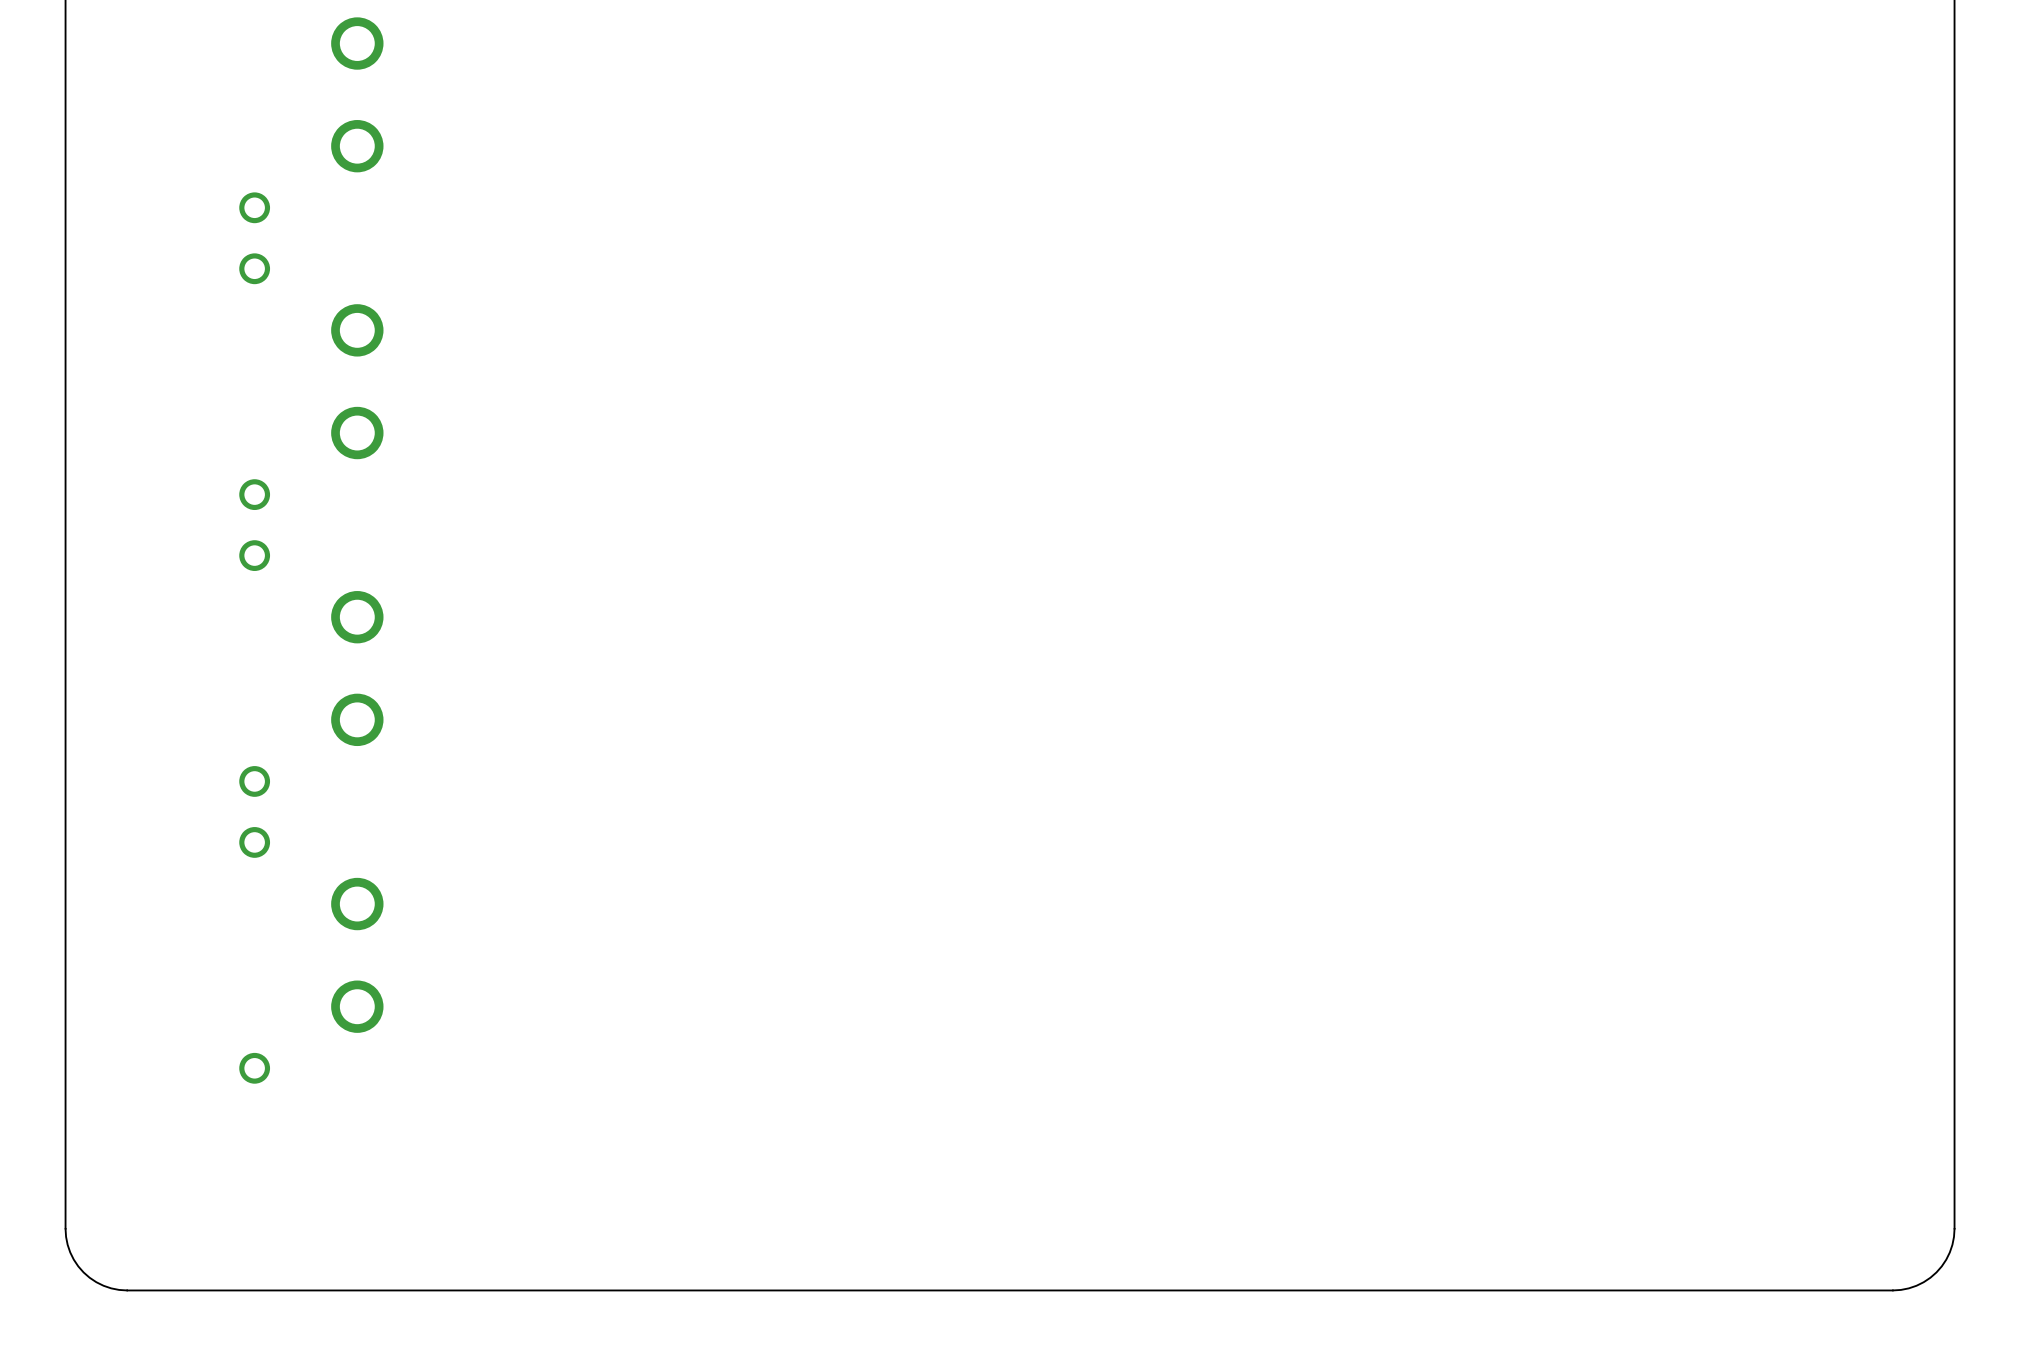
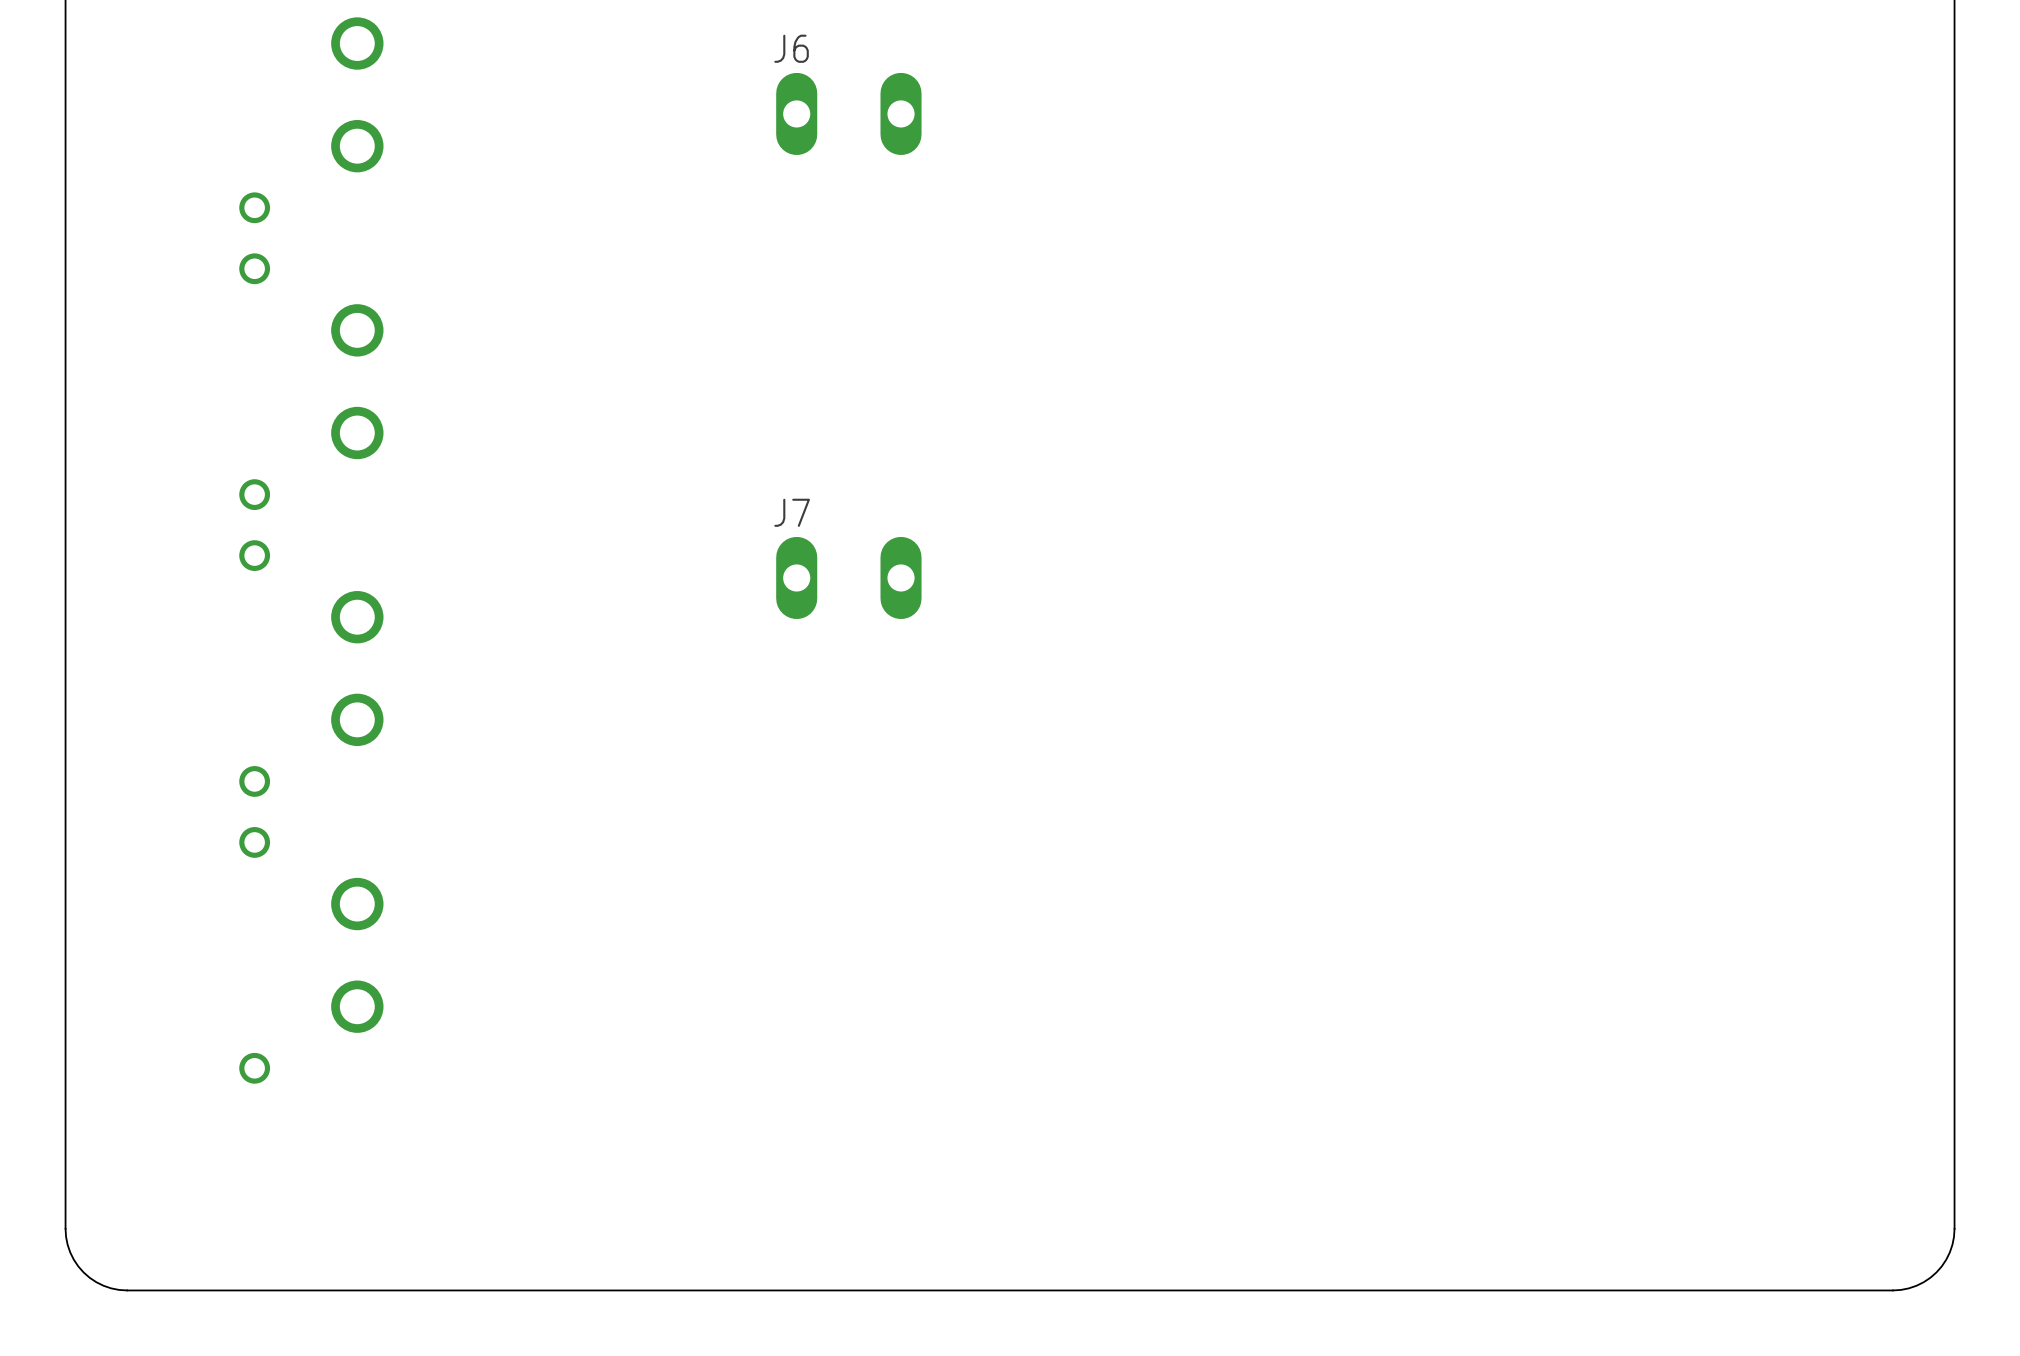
J6: none -> (848, 113)
J7: none -> (848, 577)

